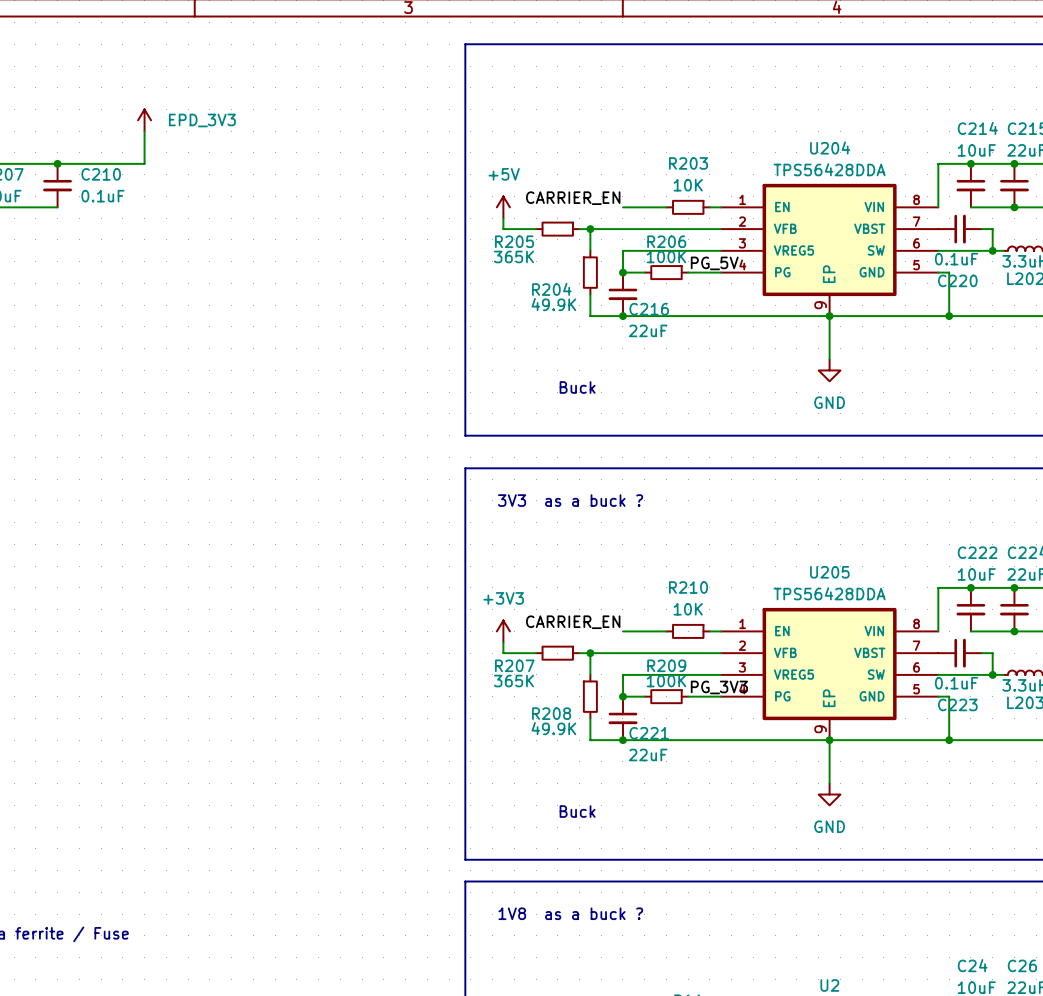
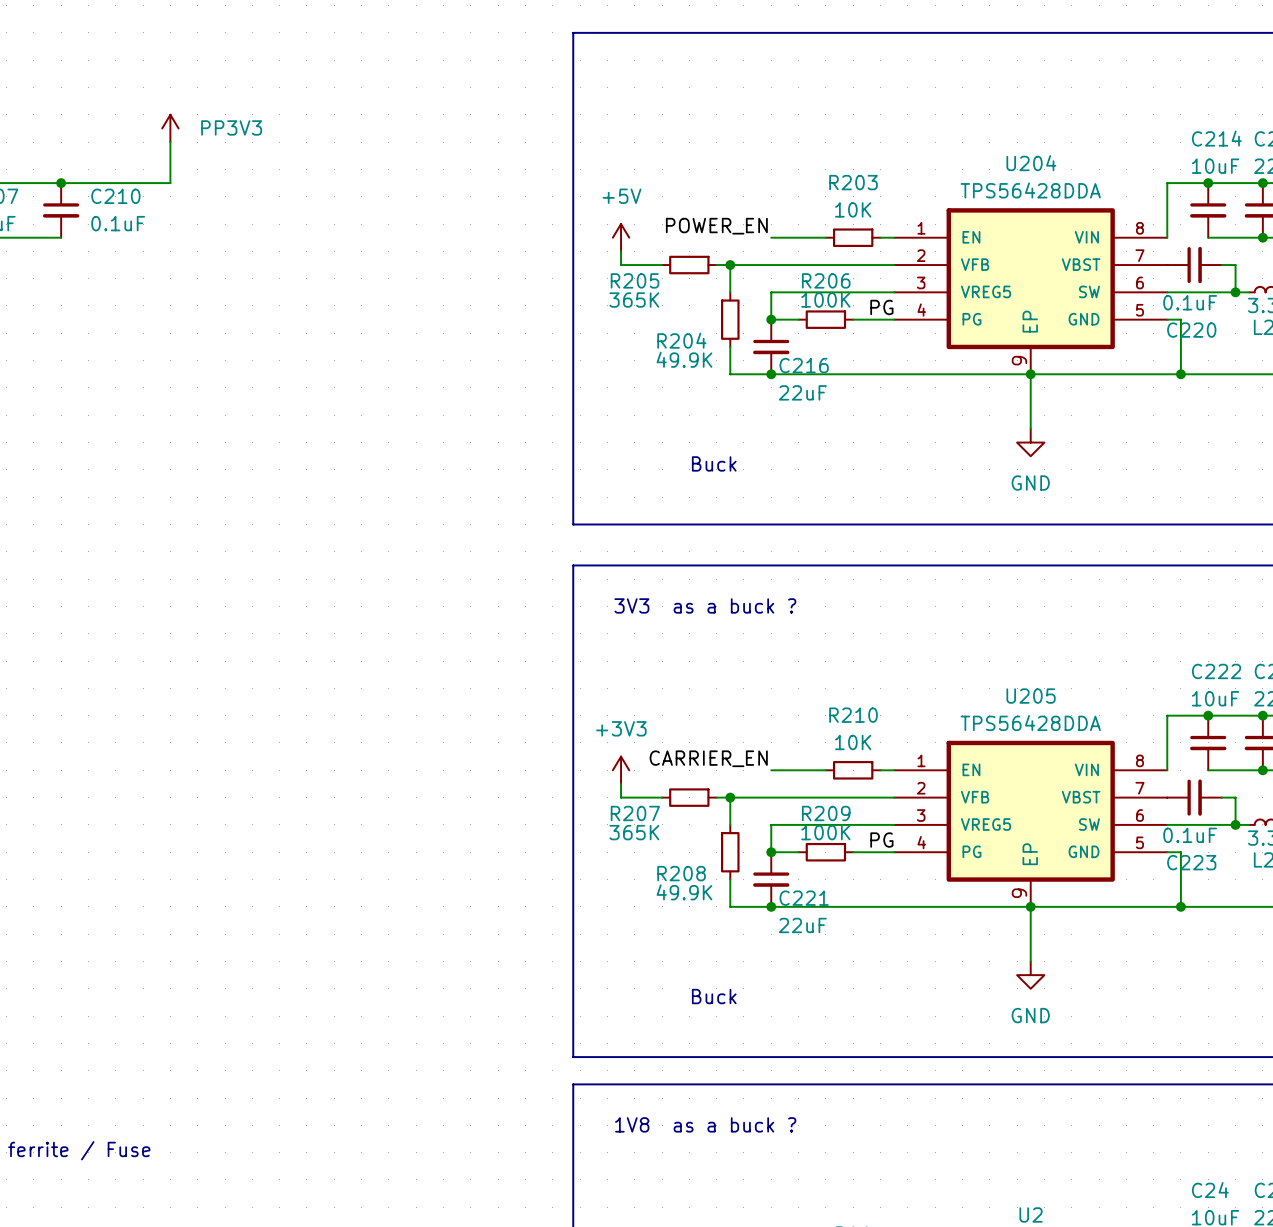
power symbol: EPD_3V3 (144, 120) -> PP3V3 (170, 128)
label: CARRIER_EN (573, 198) -> POWER_EN (716, 226)
label: none -> PG (881, 307)
label: PG_5V (714, 263) -> none
label: none -> PG (881, 840)
label: PG_3V3 (719, 687) -> none

